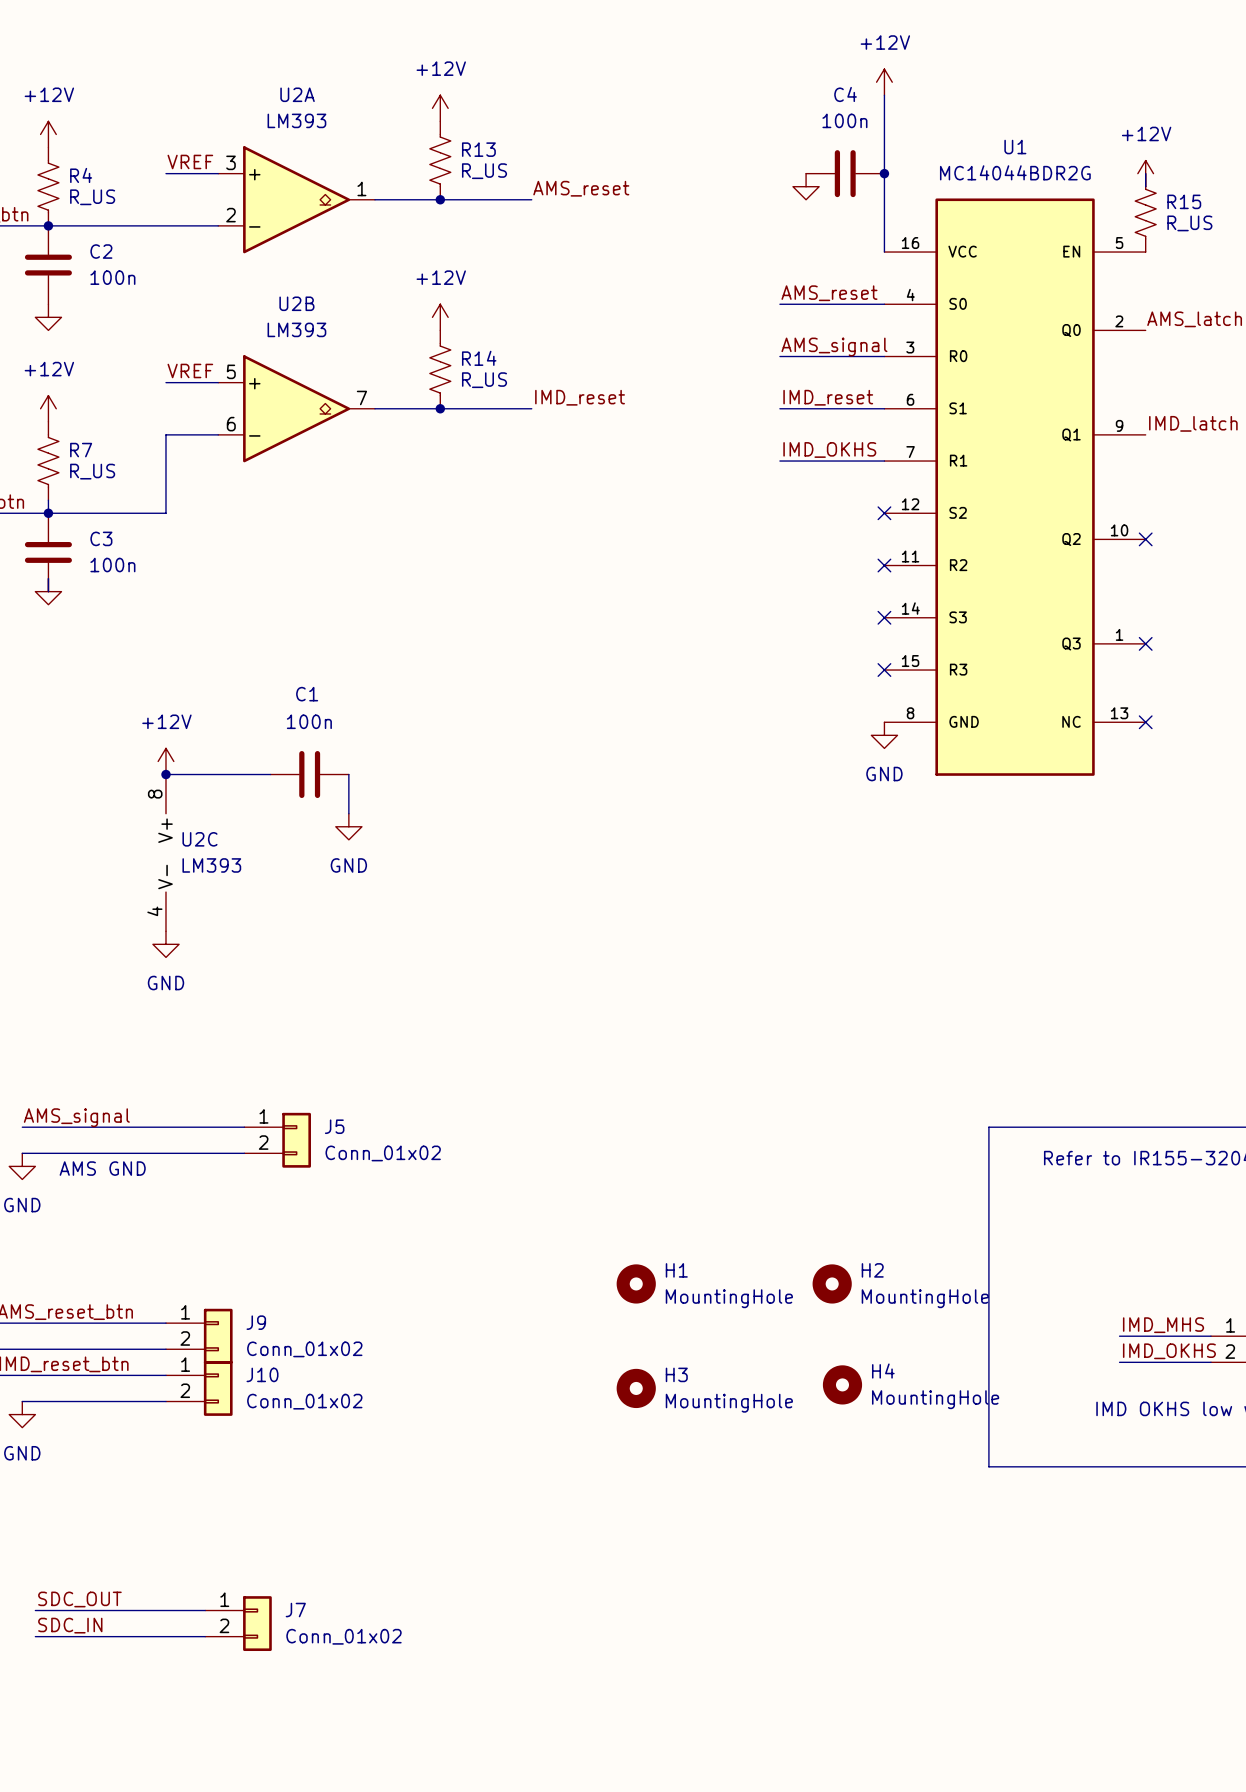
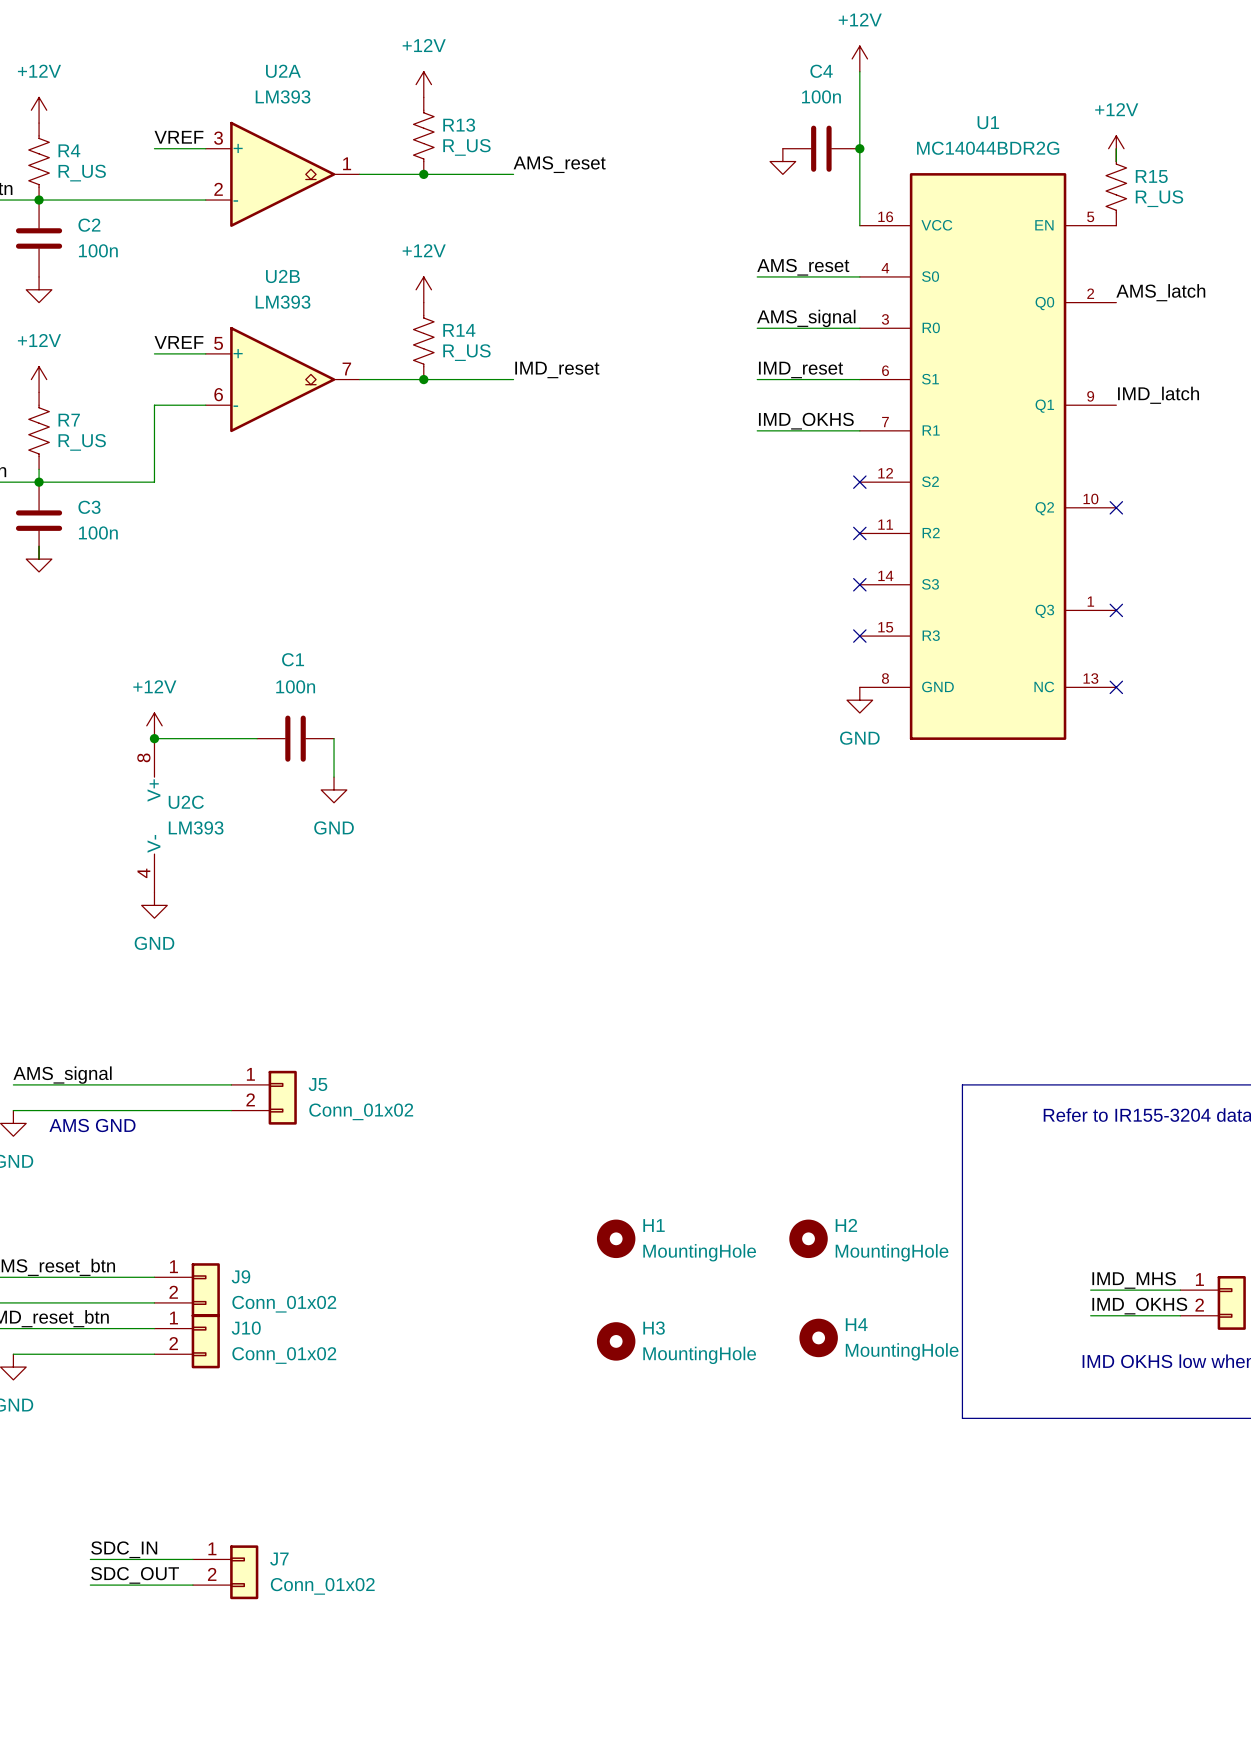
label position: SDC_OUT (79, 1599) -> SDC_OUT (135, 1575)
wire: (35, 1610) (100, 1610) -> none
label position: SDC_IN (70, 1625) -> SDC_IN (124, 1549)
wire: (35, 1636) (100, 1636) -> none

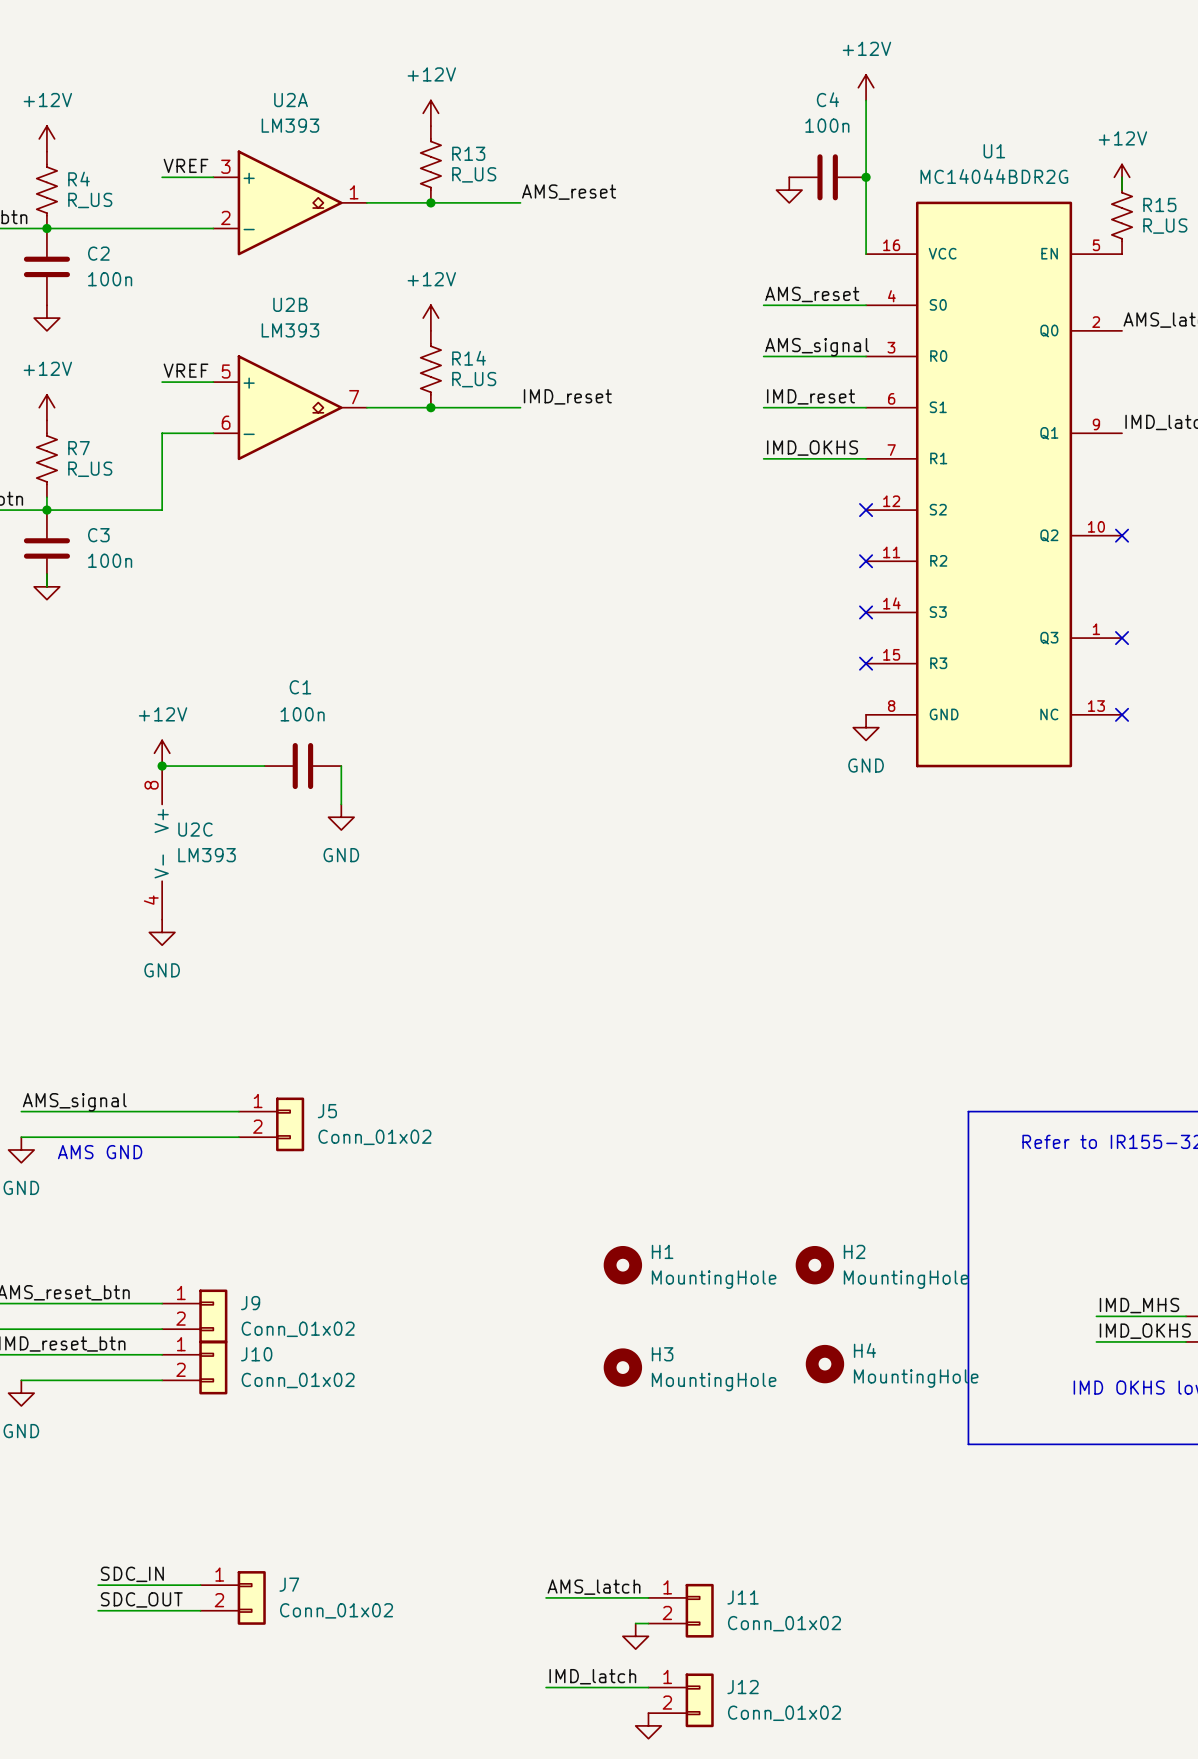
label: none -> AMS_latch (594, 1587)
wire: none -> (546, 1597) (648, 1597)
J11: none -> Conn_01x02 (681, 1610)
wire: none -> (635, 1623) (648, 1623)
power symbol: none -> (635, 1636)
label: none -> IMD_latch (592, 1676)
wire: none -> (546, 1687) (648, 1687)
J12: none -> Conn_01x02 (681, 1700)
power symbol: none -> (648, 1725)

